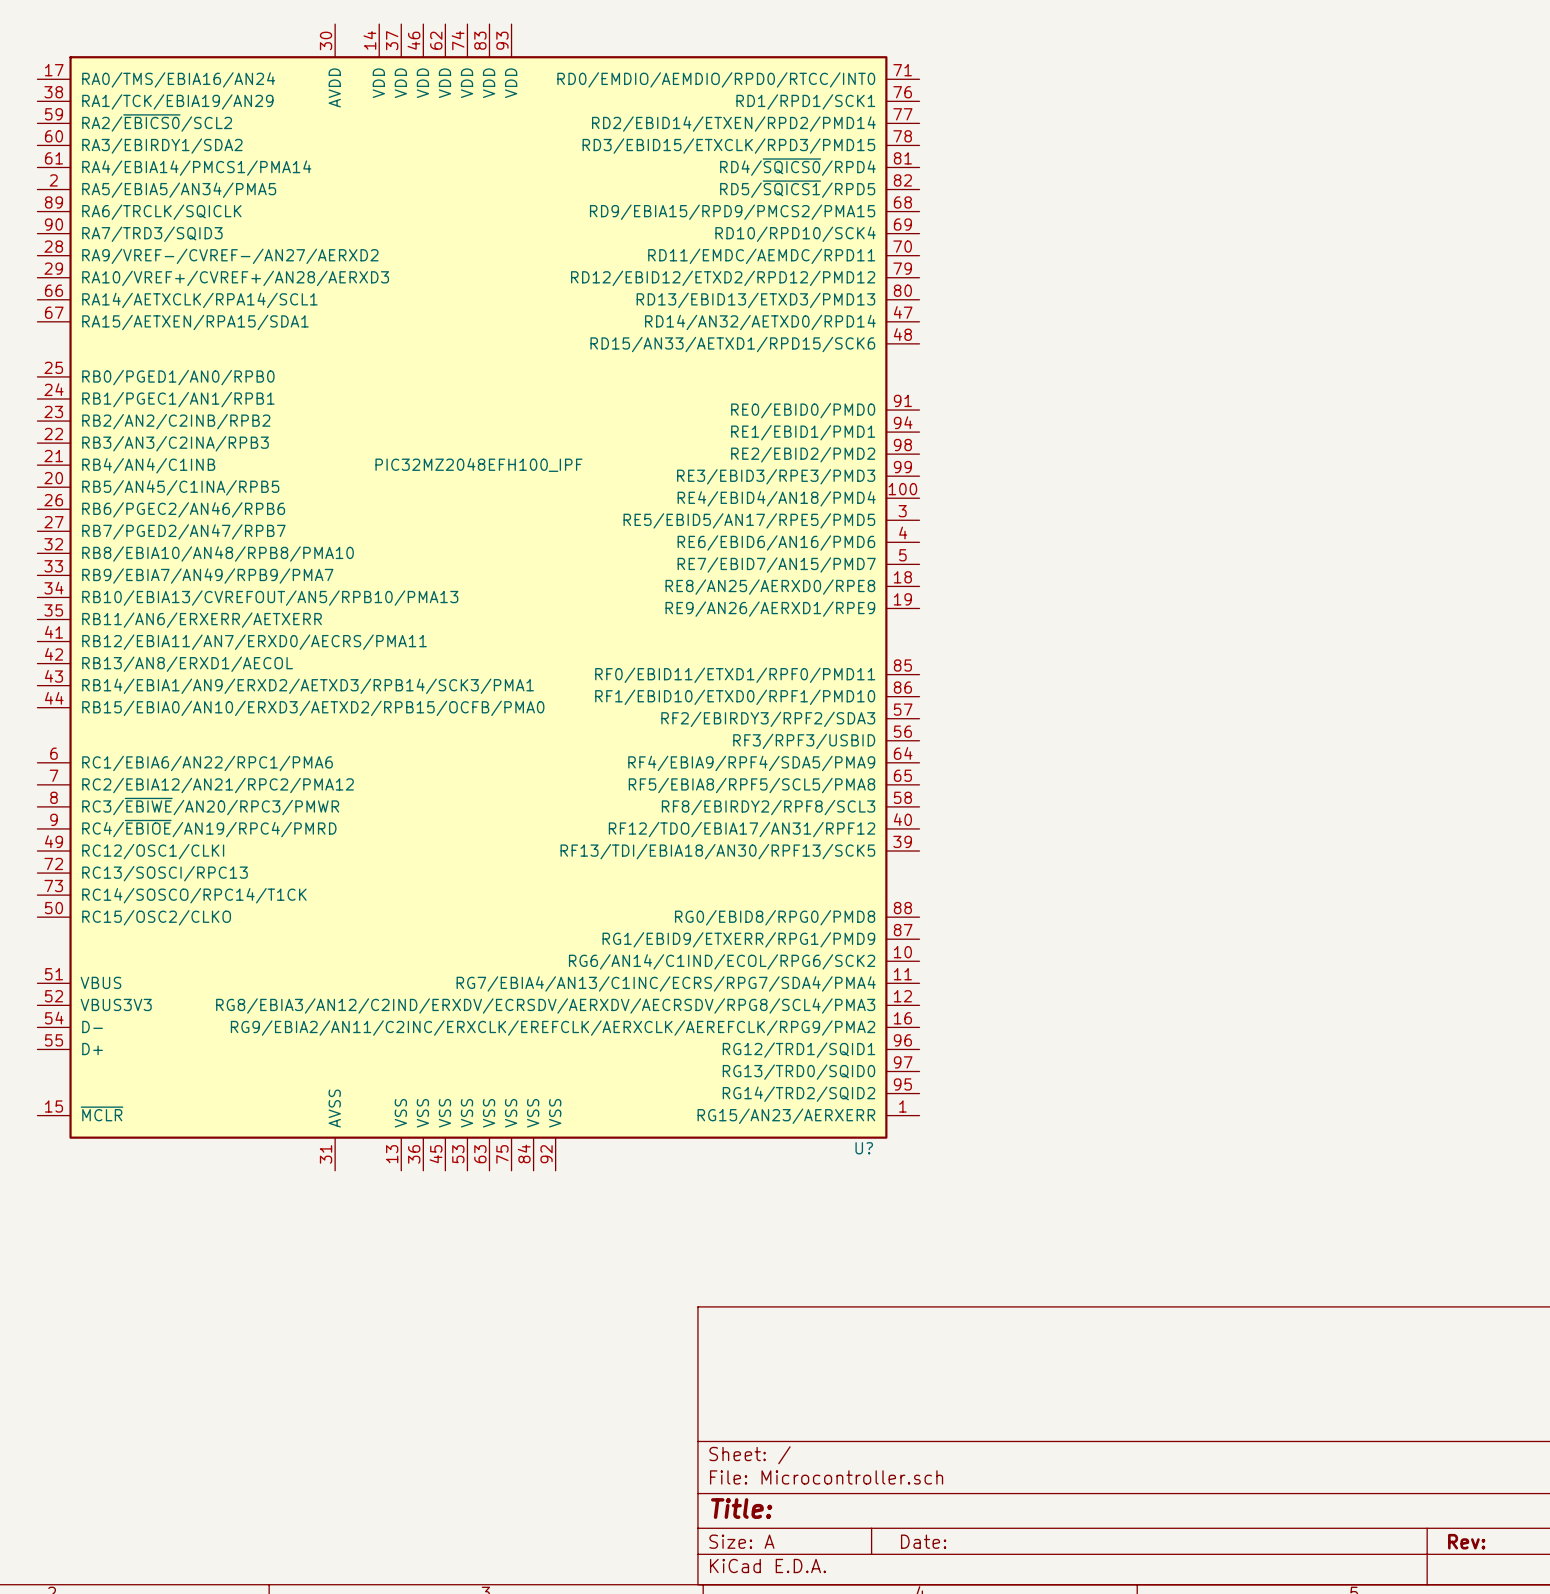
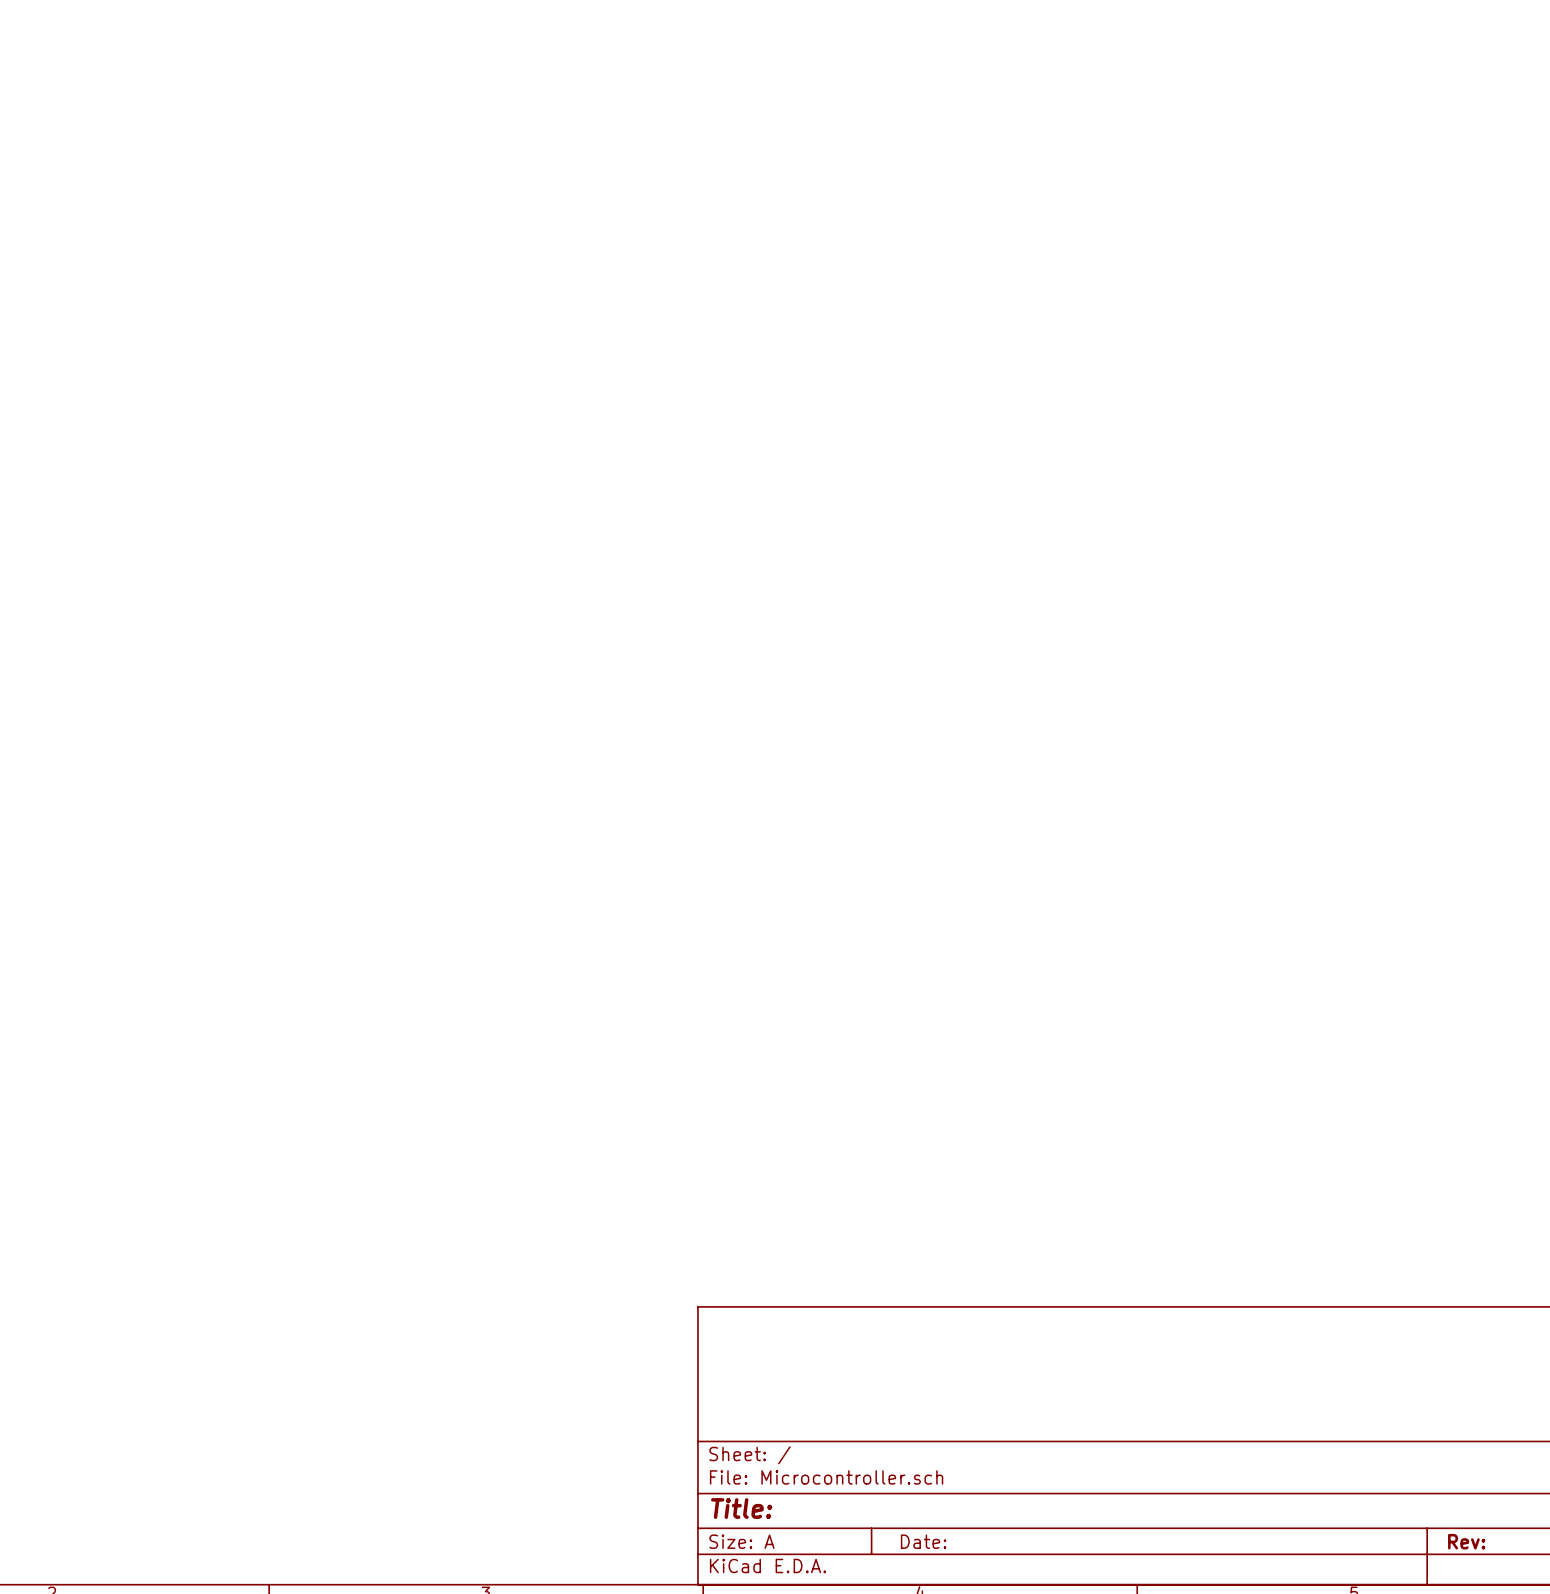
U?: PIC32MZ2048EFH100_IPF (478, 597) -> none

